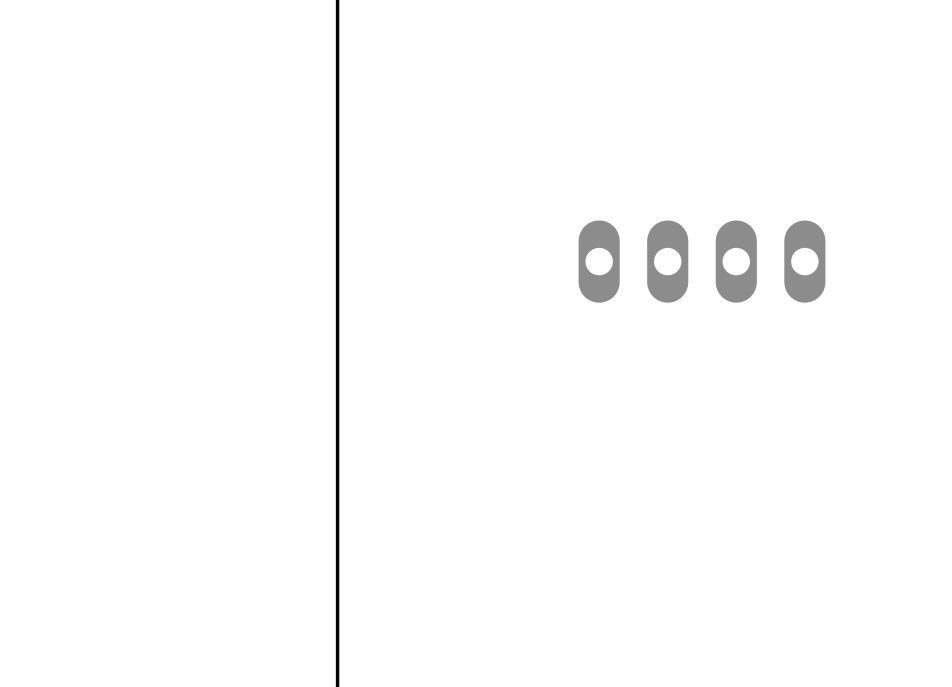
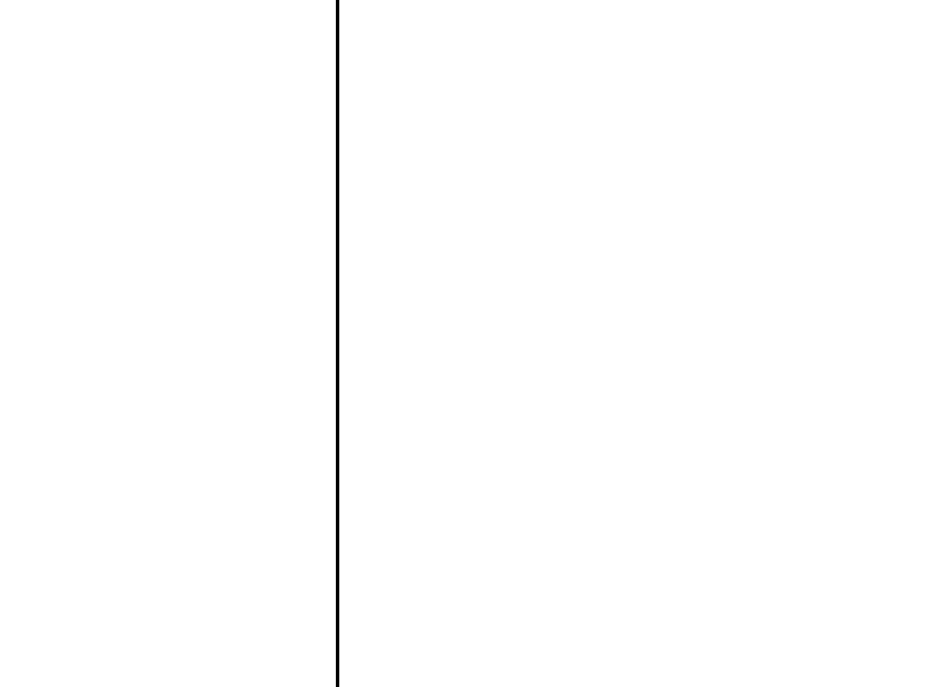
part: (702, 261) -> none

